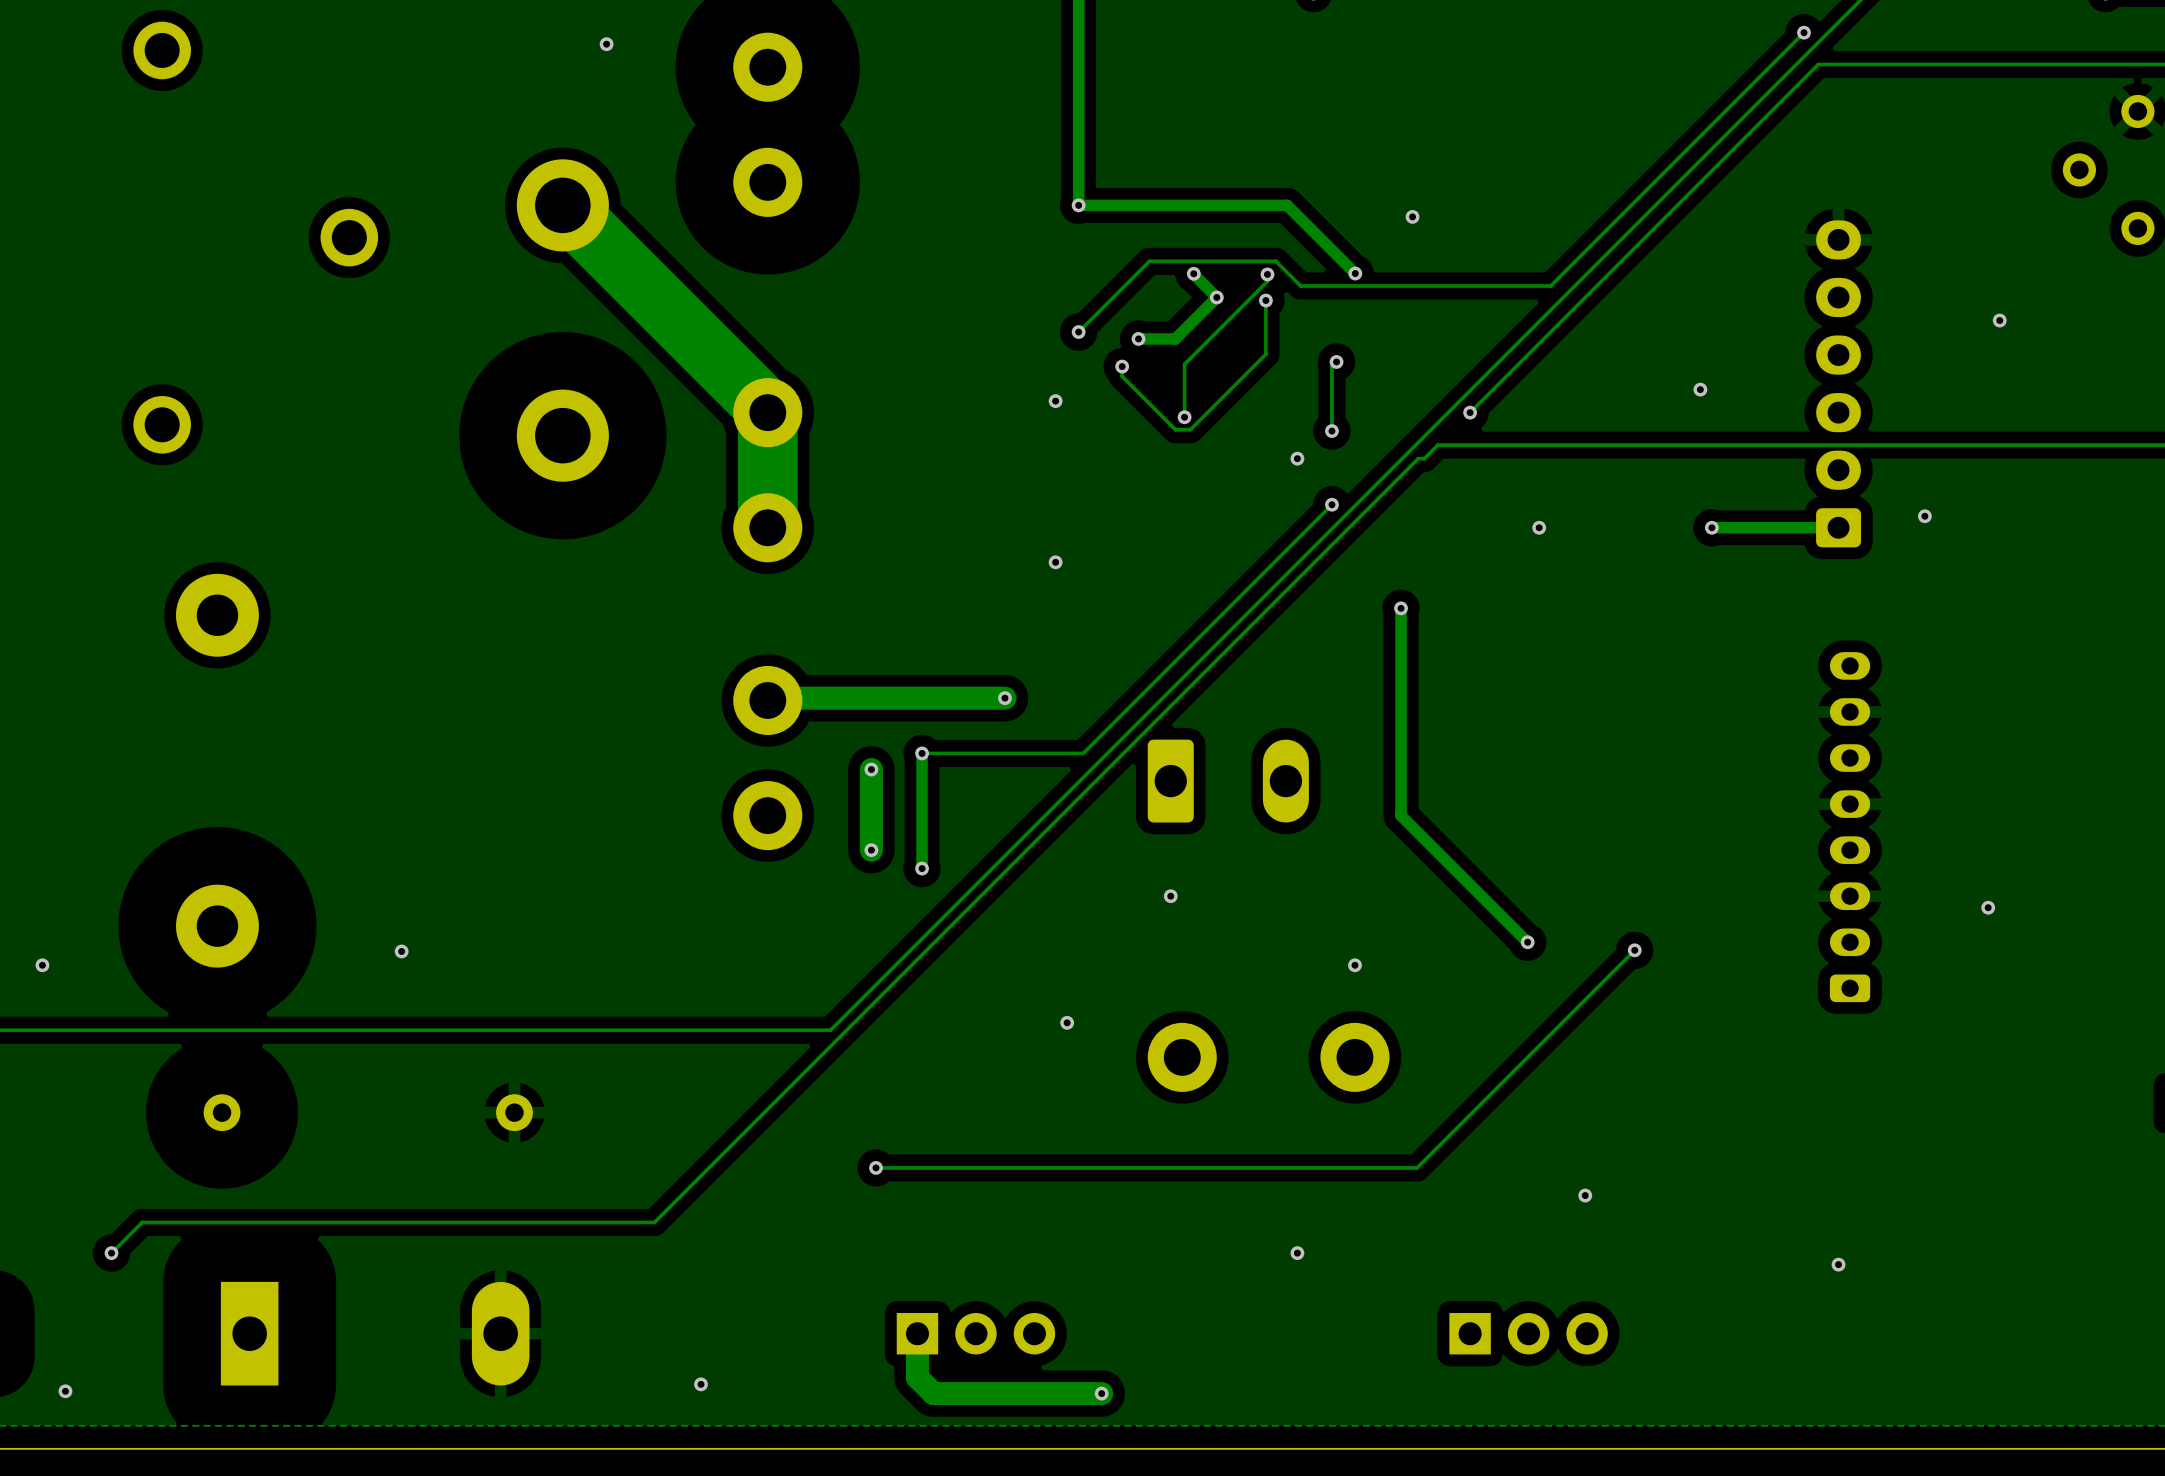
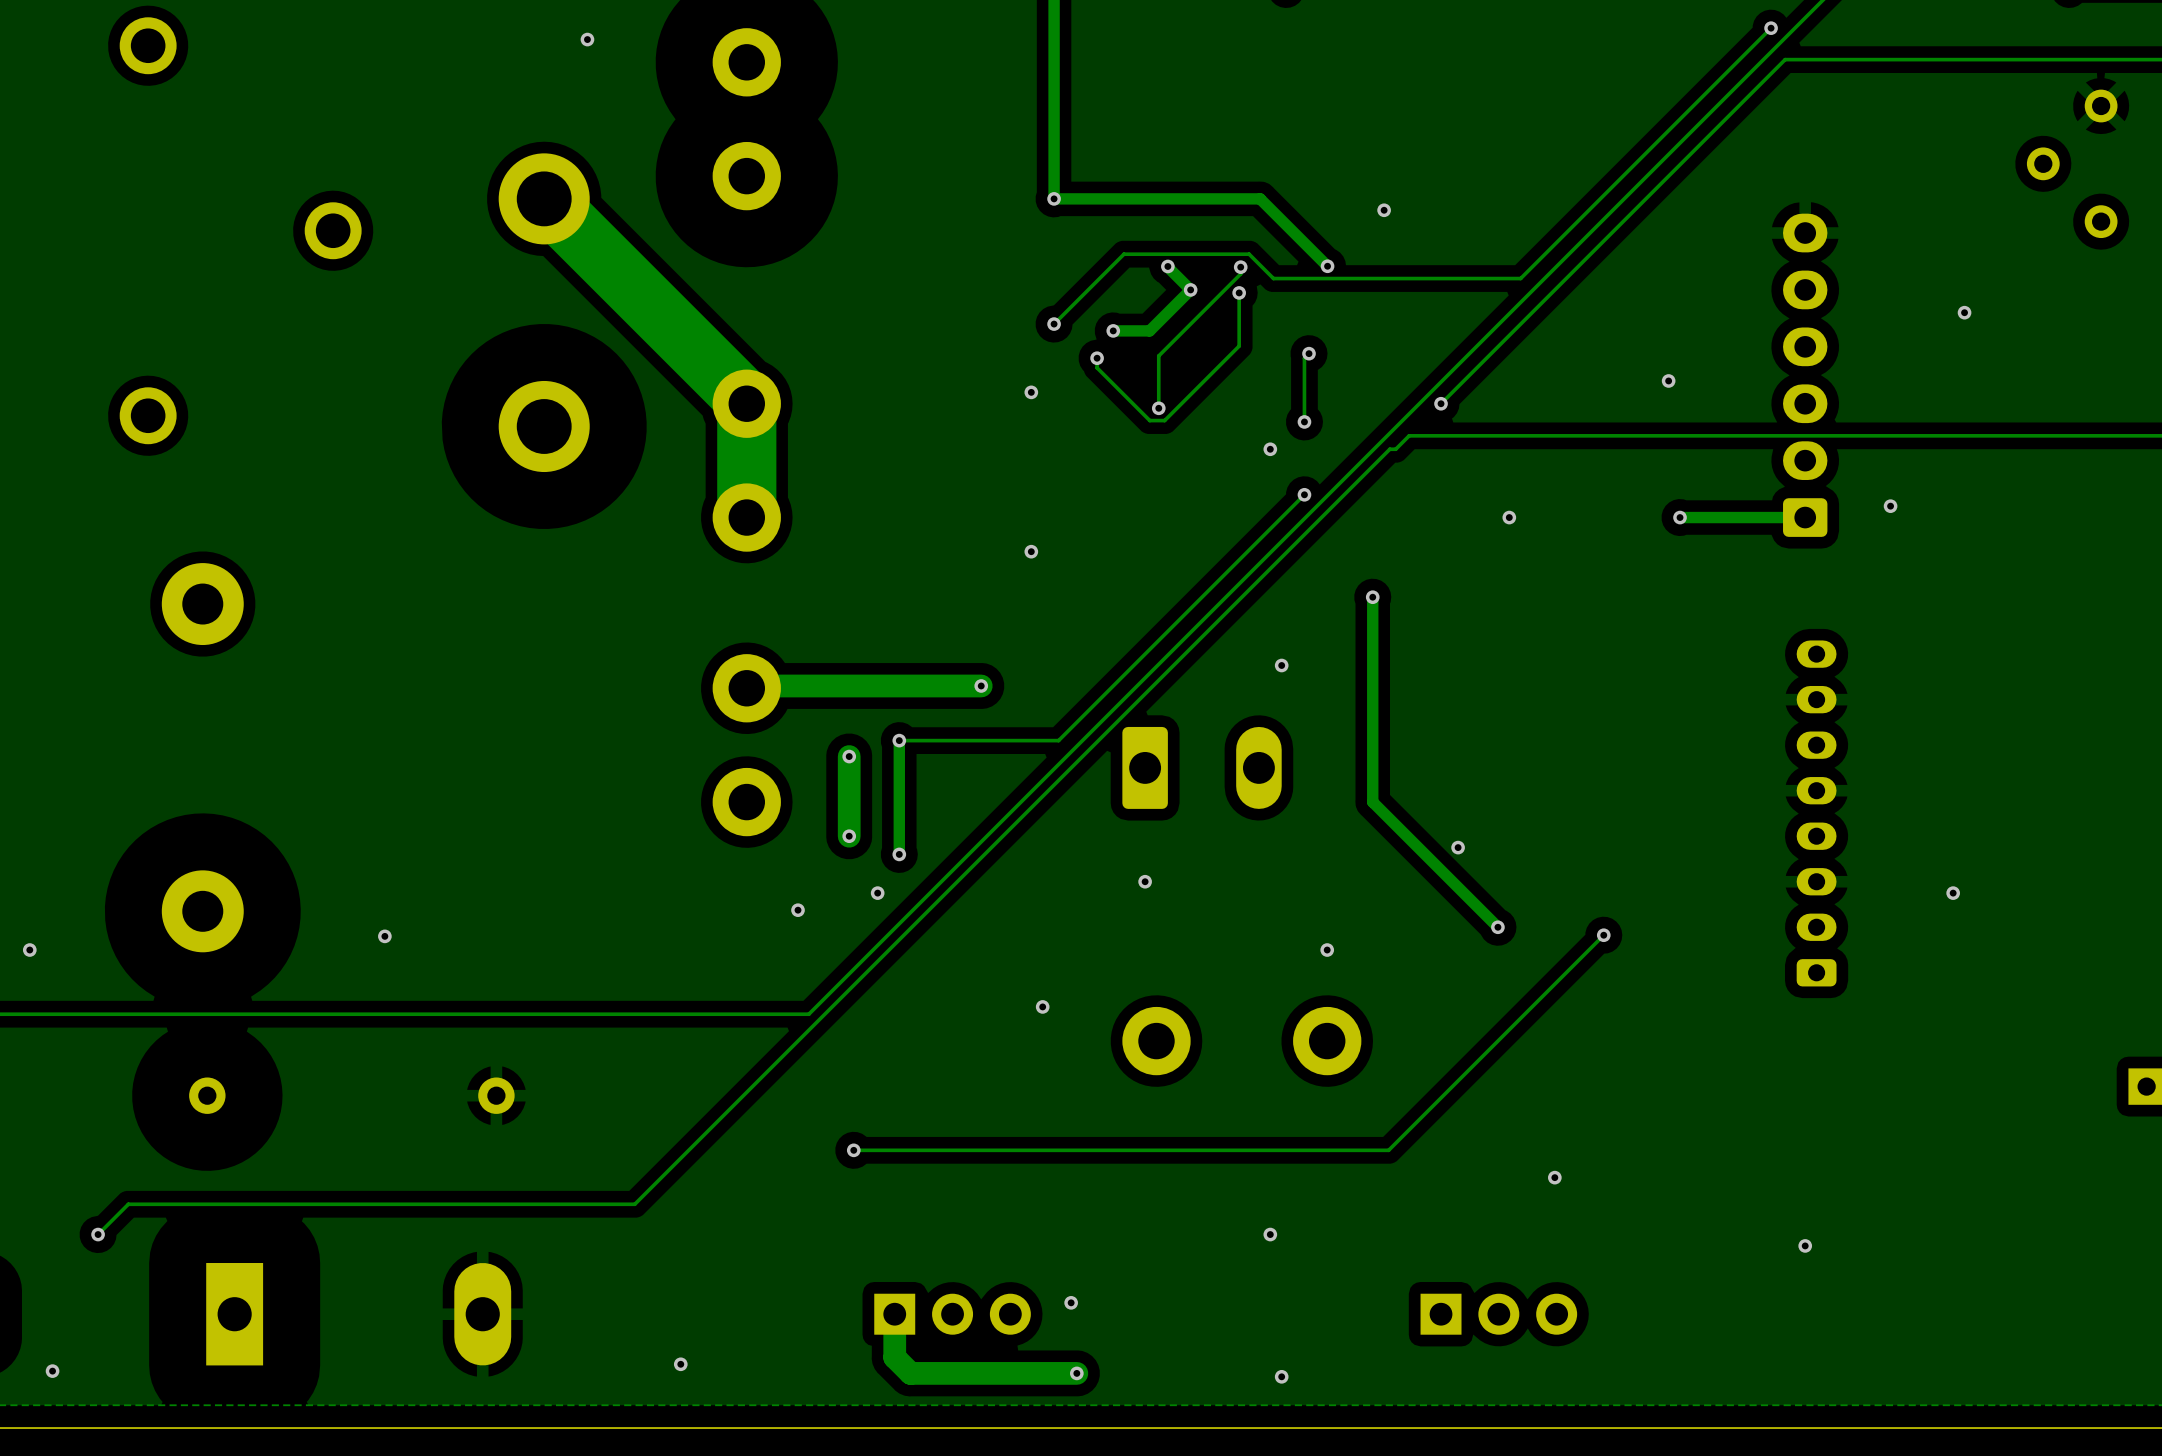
via: none -> (1281, 665)
via: none -> (1458, 847)
via: none -> (877, 893)
via: none -> (798, 910)
via: none -> (1071, 1302)
via: none -> (1281, 1376)

